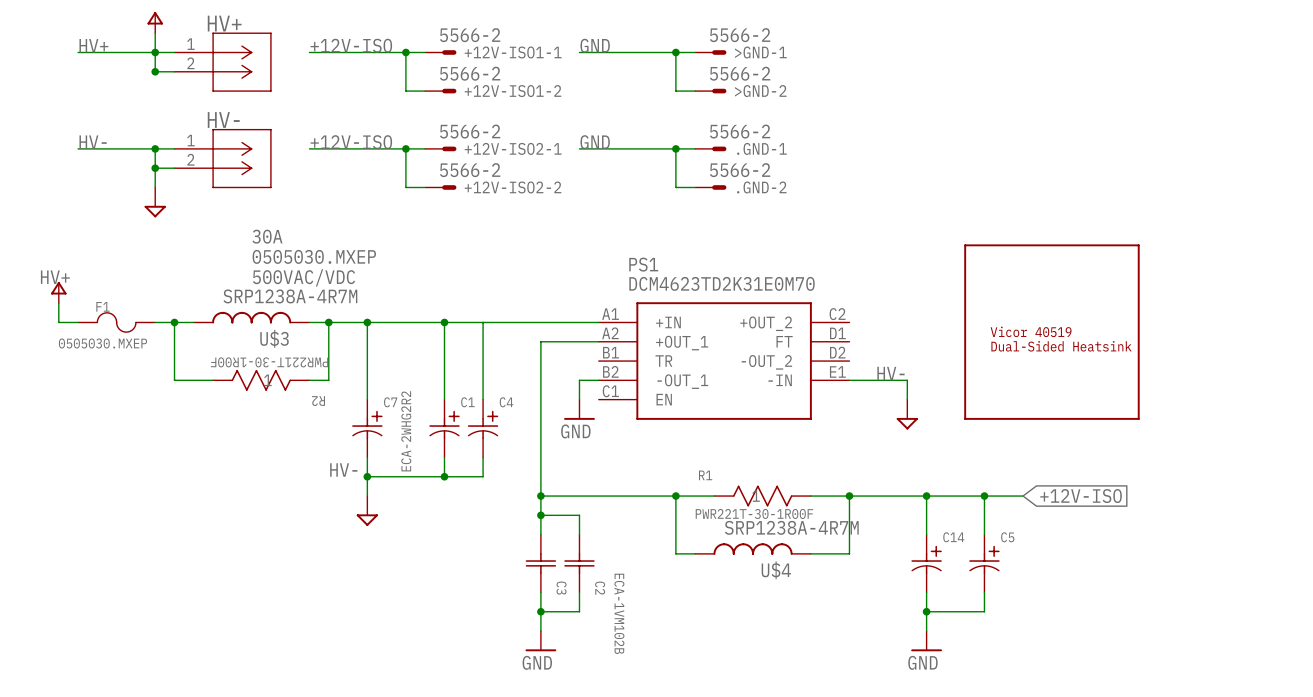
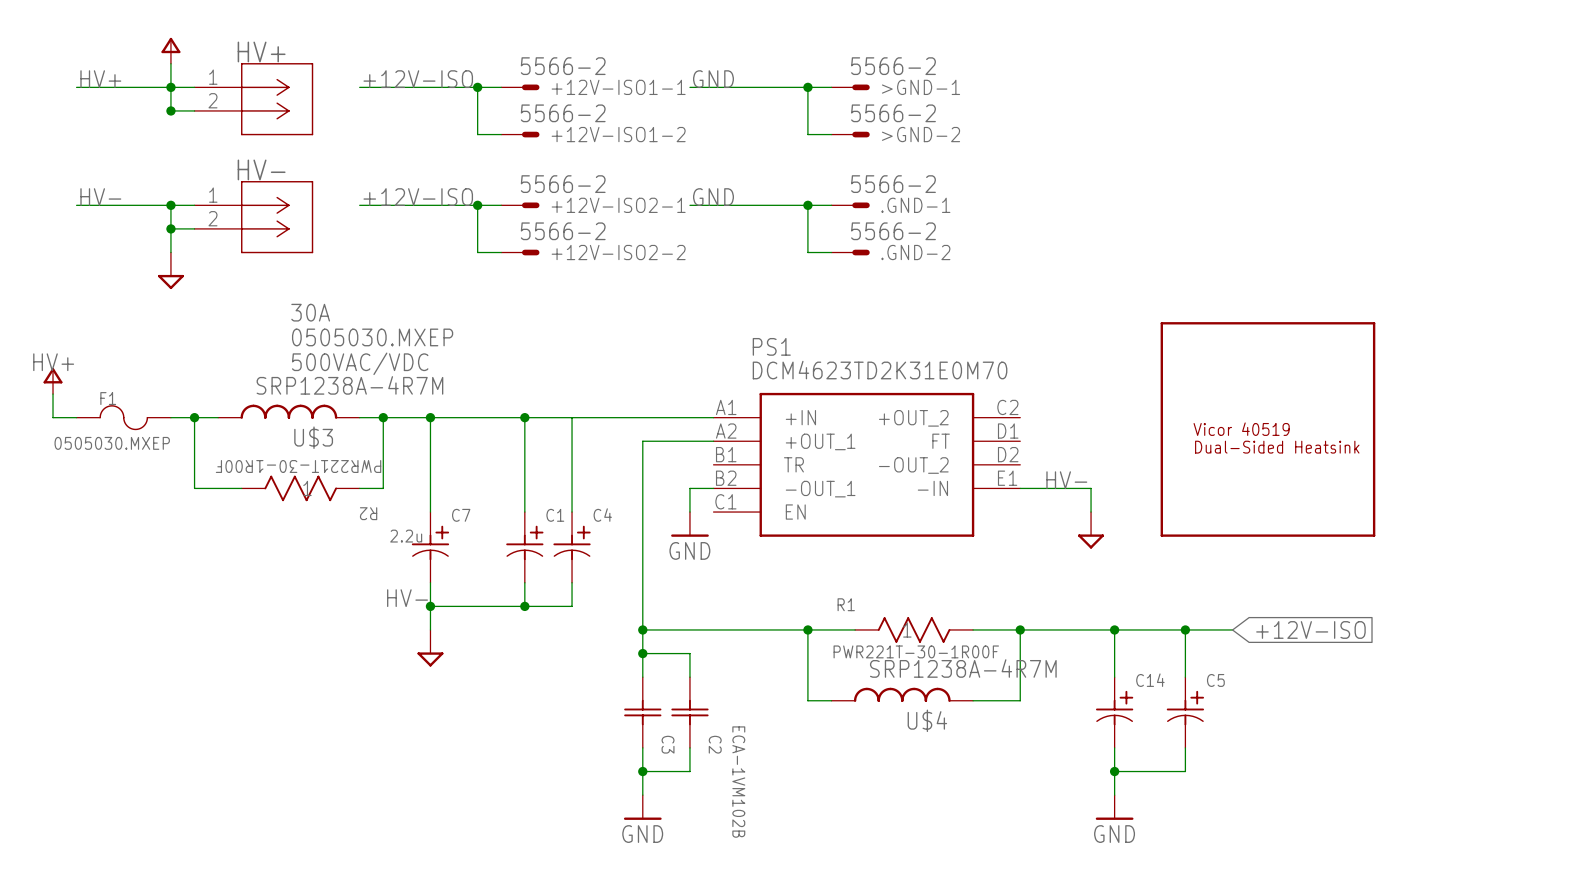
C7 value: ECA-2WHG2R2 (406, 431) -> 2.2u (406, 536)

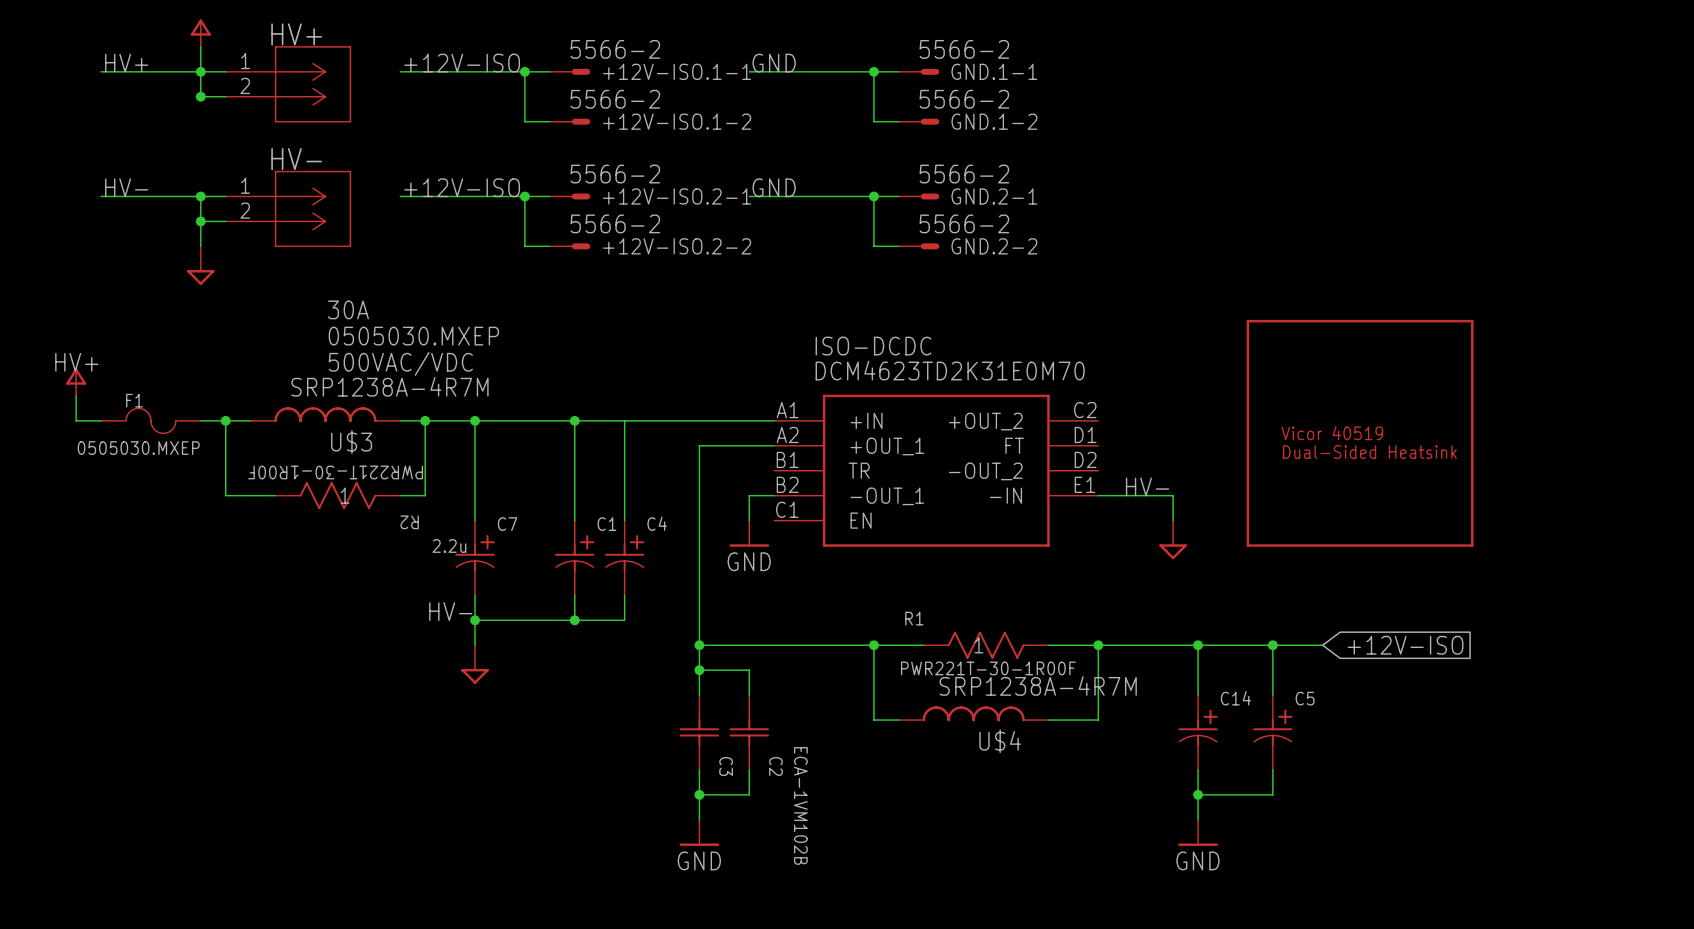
+12V-ISO1-1 name: +12V-ISO1-1 (618, 87) -> +12V-ISO.1-1 (677, 71)
GND.1-1 name: >GND-1 (921, 87) -> GND.1-1 (994, 71)
+12V-ISO1-2 name: +12V-ISO1-2 (618, 134) -> +12V-ISO.1-2 (677, 121)
GND.1-2 name: >GND-2 (921, 134) -> GND.1-2 (994, 121)
+12V-ISO2-1 name: +12V-ISO2-1 (618, 205) -> +12V-ISO.2-1 (677, 196)
.GND-1 name: .GND-1 (915, 205) -> GND.2-1 (994, 196)
+12V-ISO2-2 name: +12V-ISO2-2 (618, 252) -> +12V-ISO.2-2 (677, 246)
.GND-2 name: .GND-2 (915, 252) -> GND.2-2 (994, 246)
PS1 name: PS1 (771, 346) -> ISO-DCDC (873, 346)

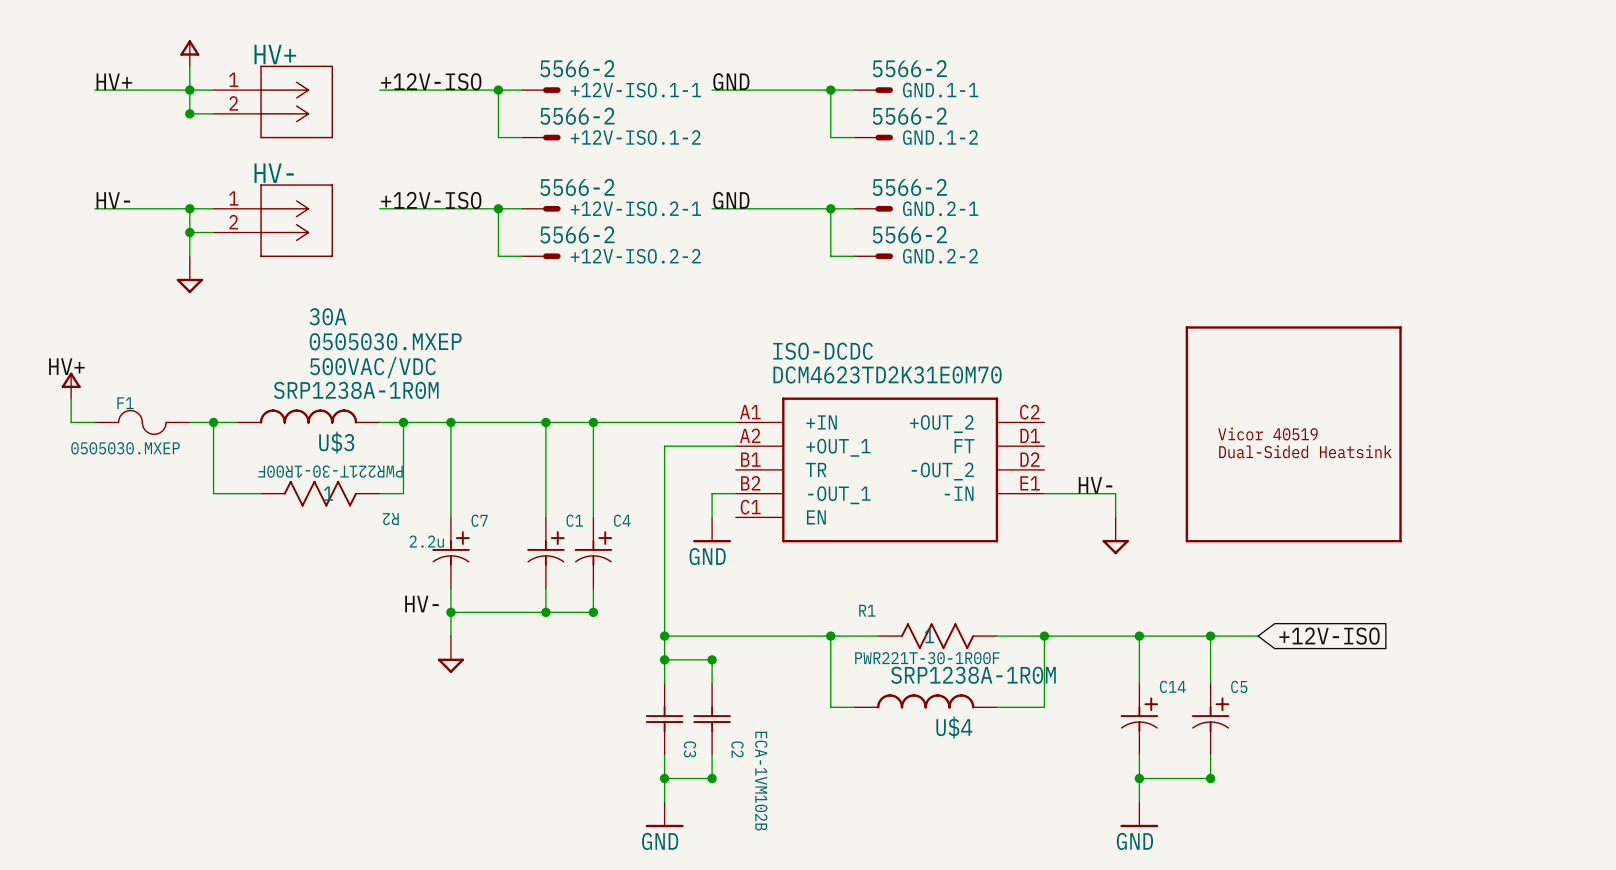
U$3 value: SRP1238A-4R7M (389, 386) -> SRP1238A-1R0M (356, 390)
junction: none -> (593, 422)
junction: none -> (593, 612)
junction: none -> (712, 659)
U$4 value: SRP1238A-4R7M (1038, 685) -> SRP1238A-1R0M (973, 675)
junction: none -> (712, 778)
junction: none -> (1210, 778)

